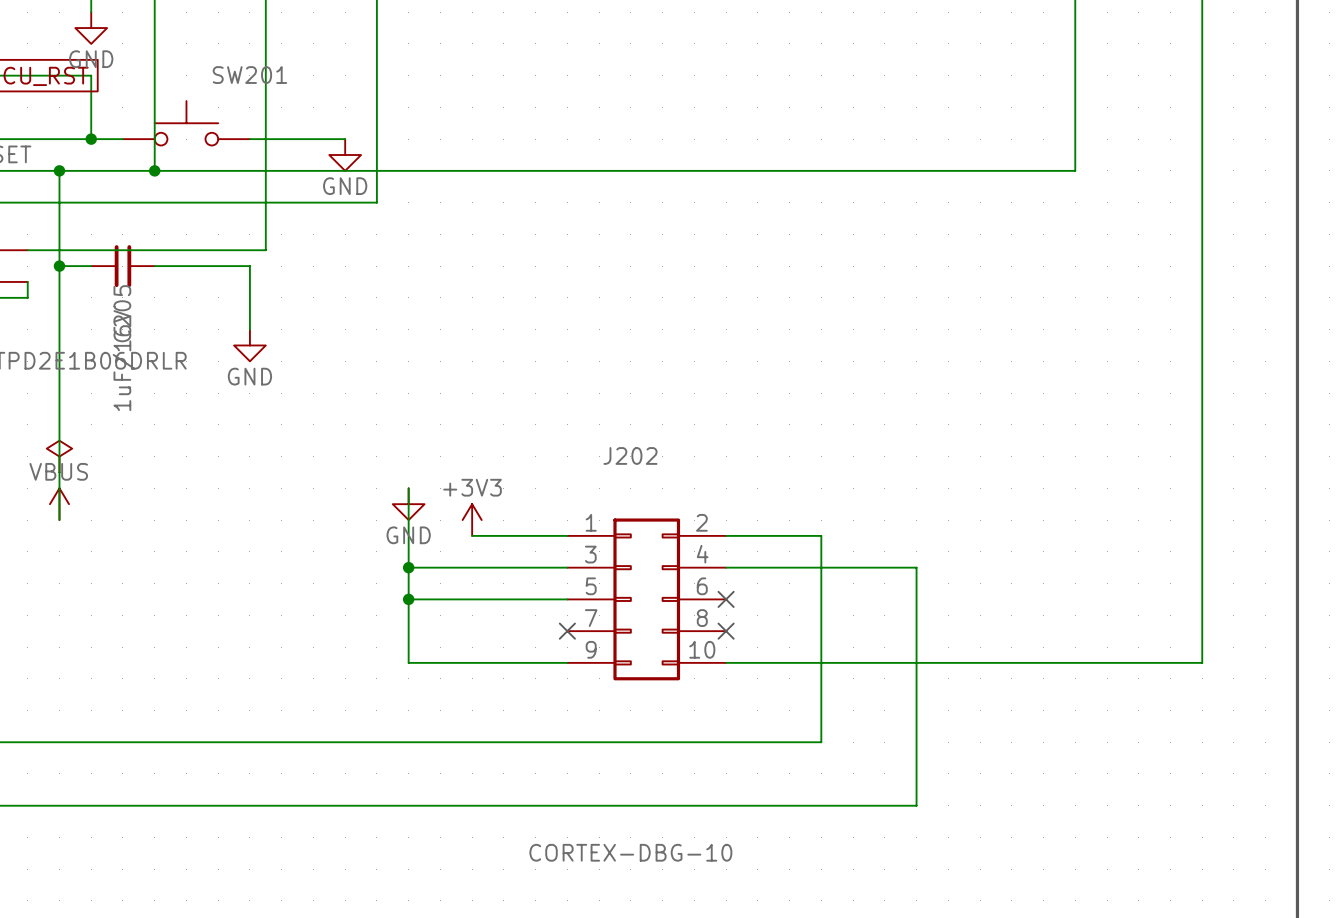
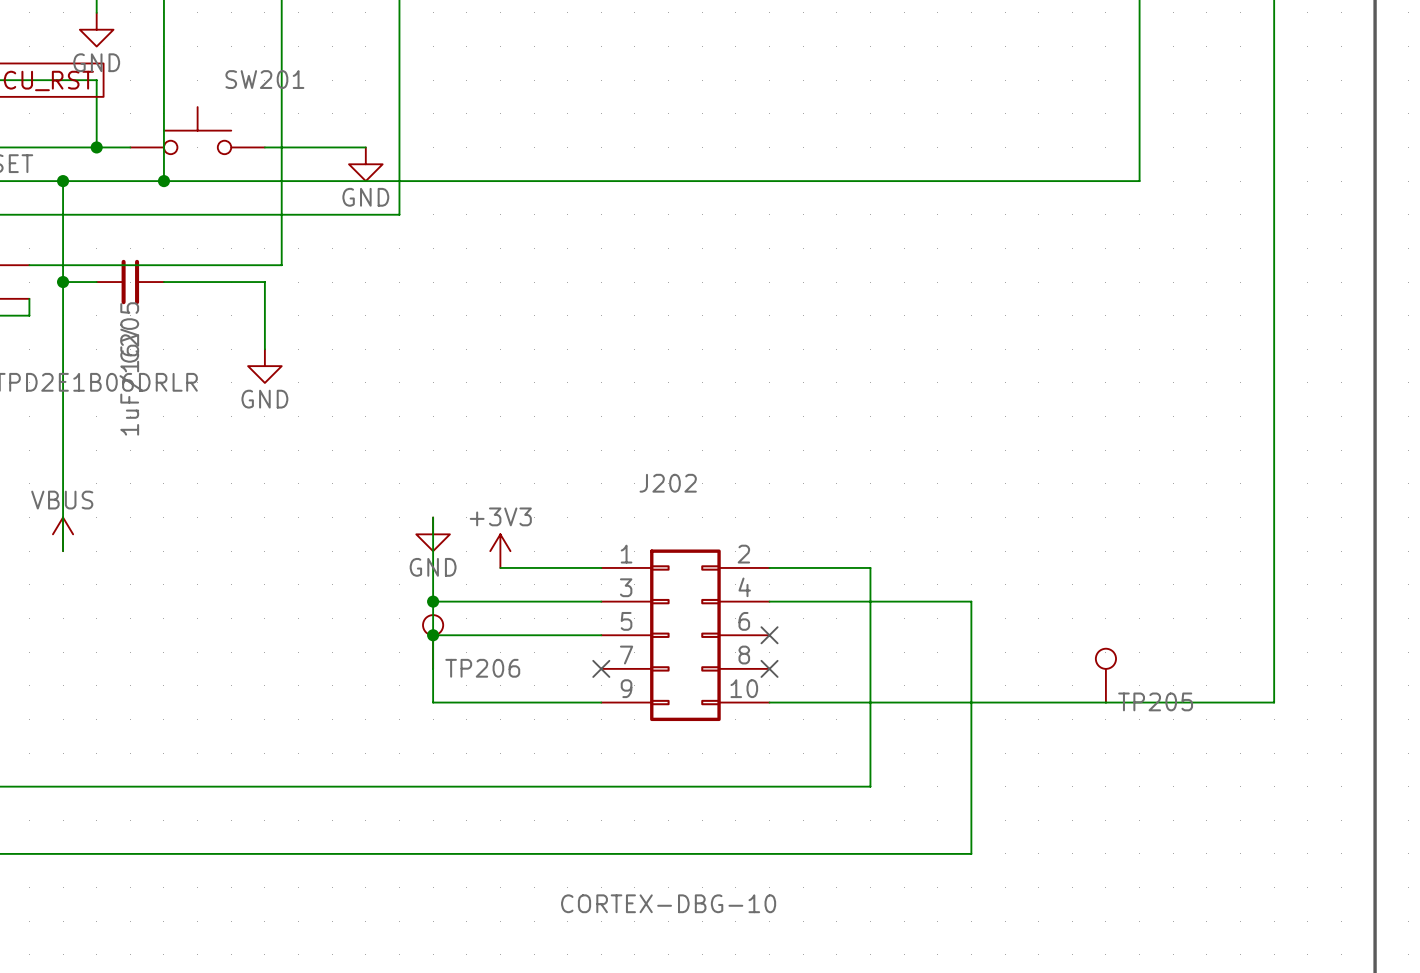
power symbol: (59, 456) -> none
part: none -> TP206 (433, 641)
part: none -> TP205 (1105, 675)

